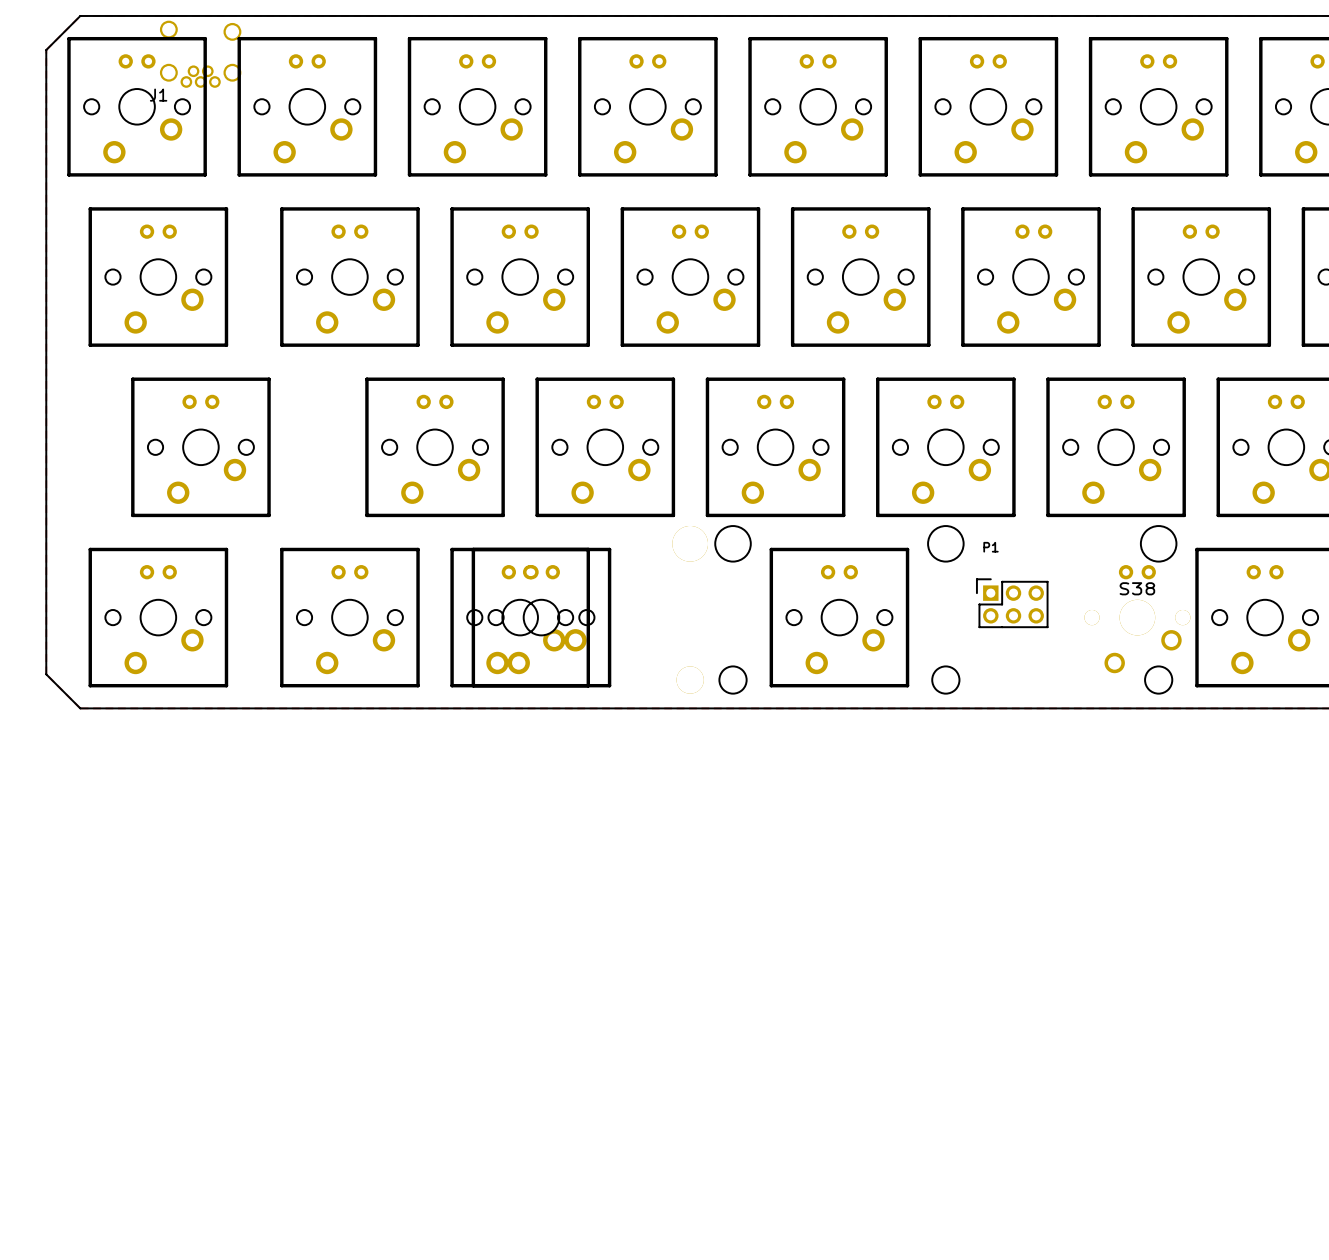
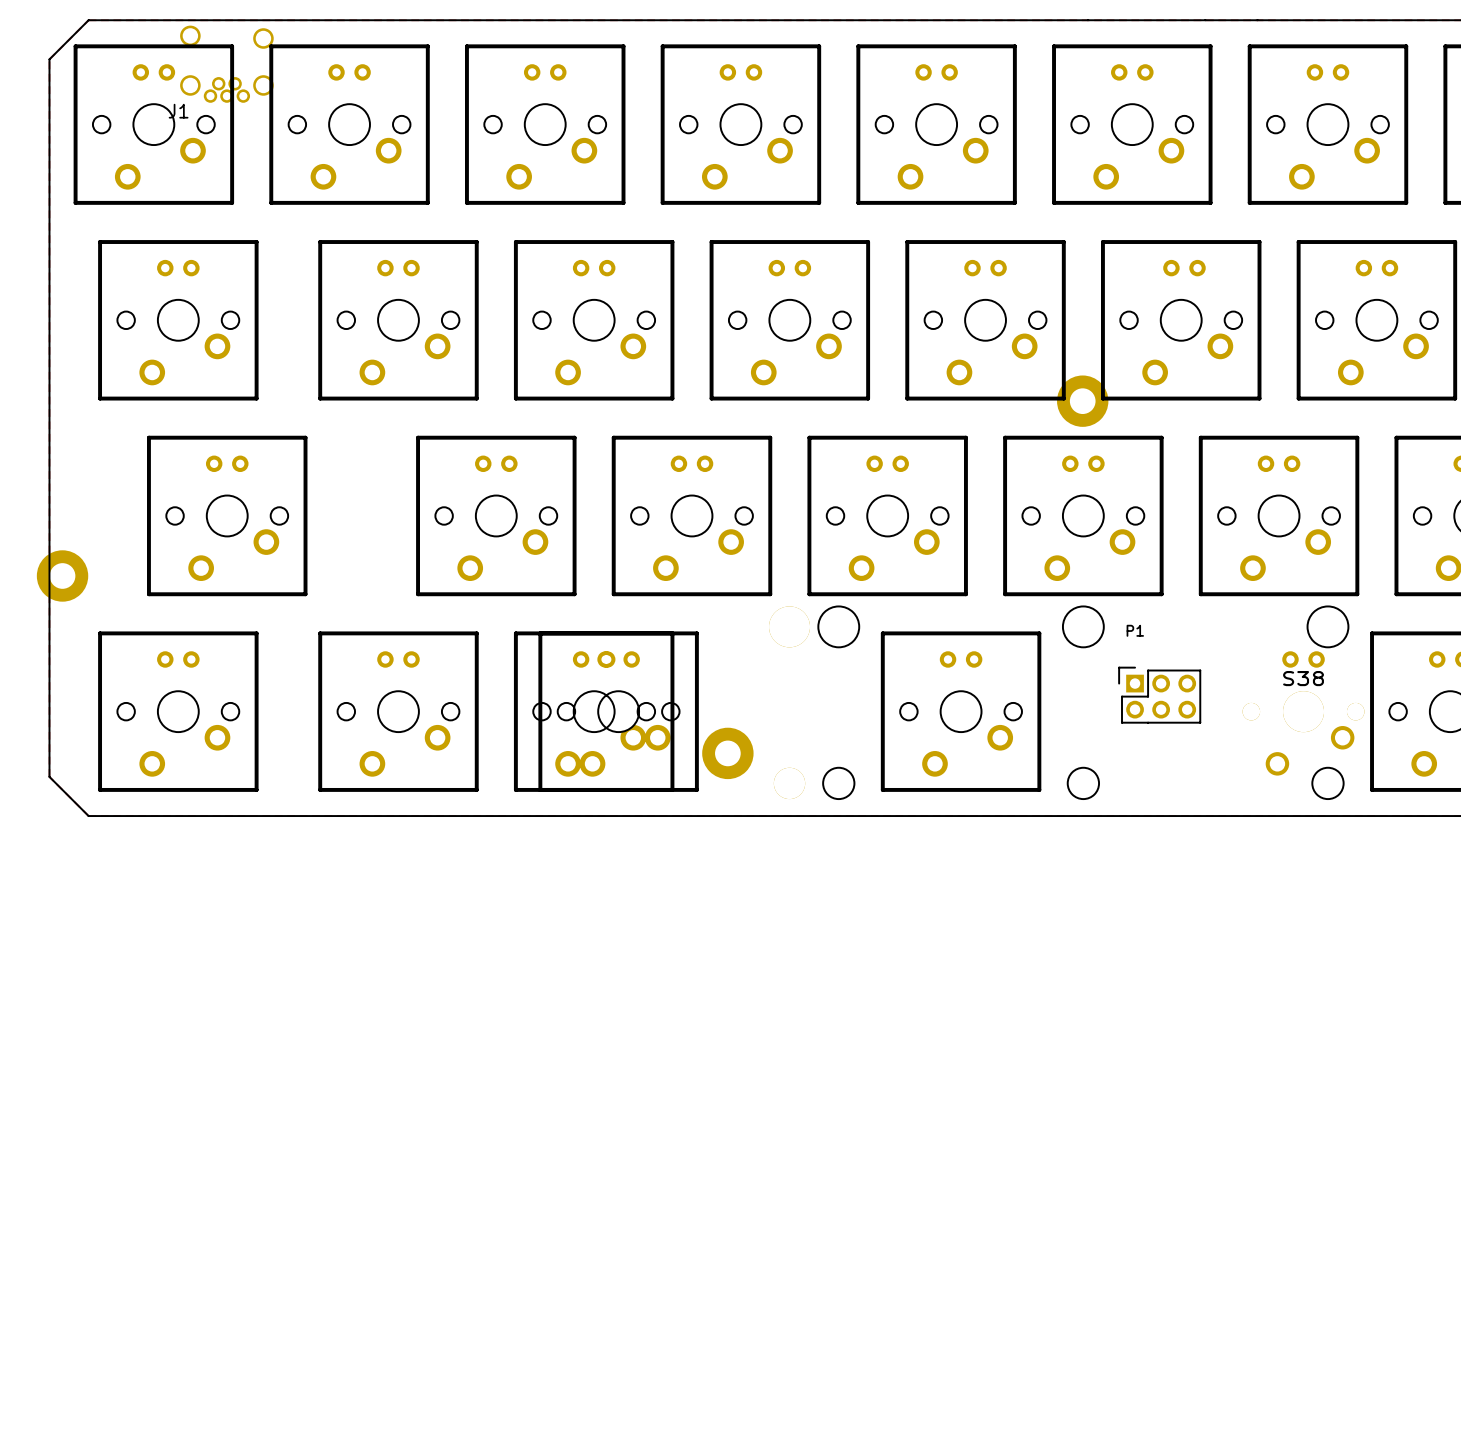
part: none -> (1082, 401)
part: none -> (62, 575)
part: none -> (727, 753)

